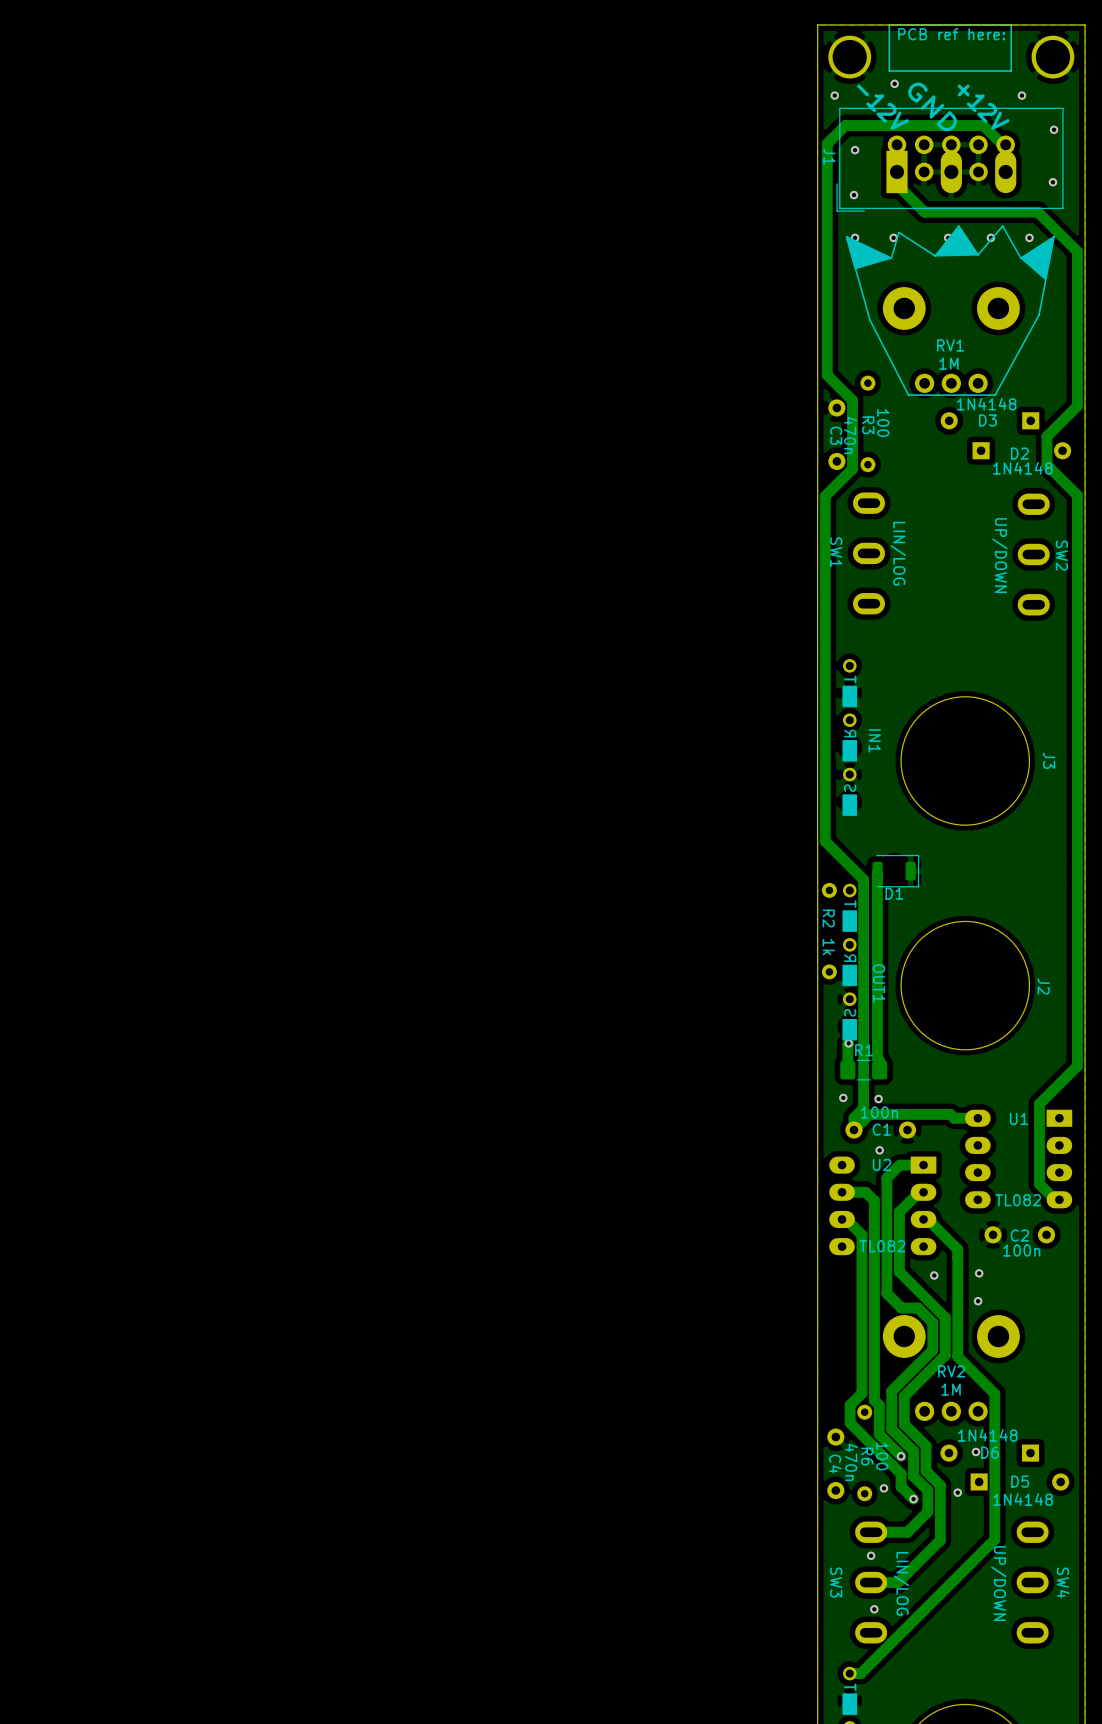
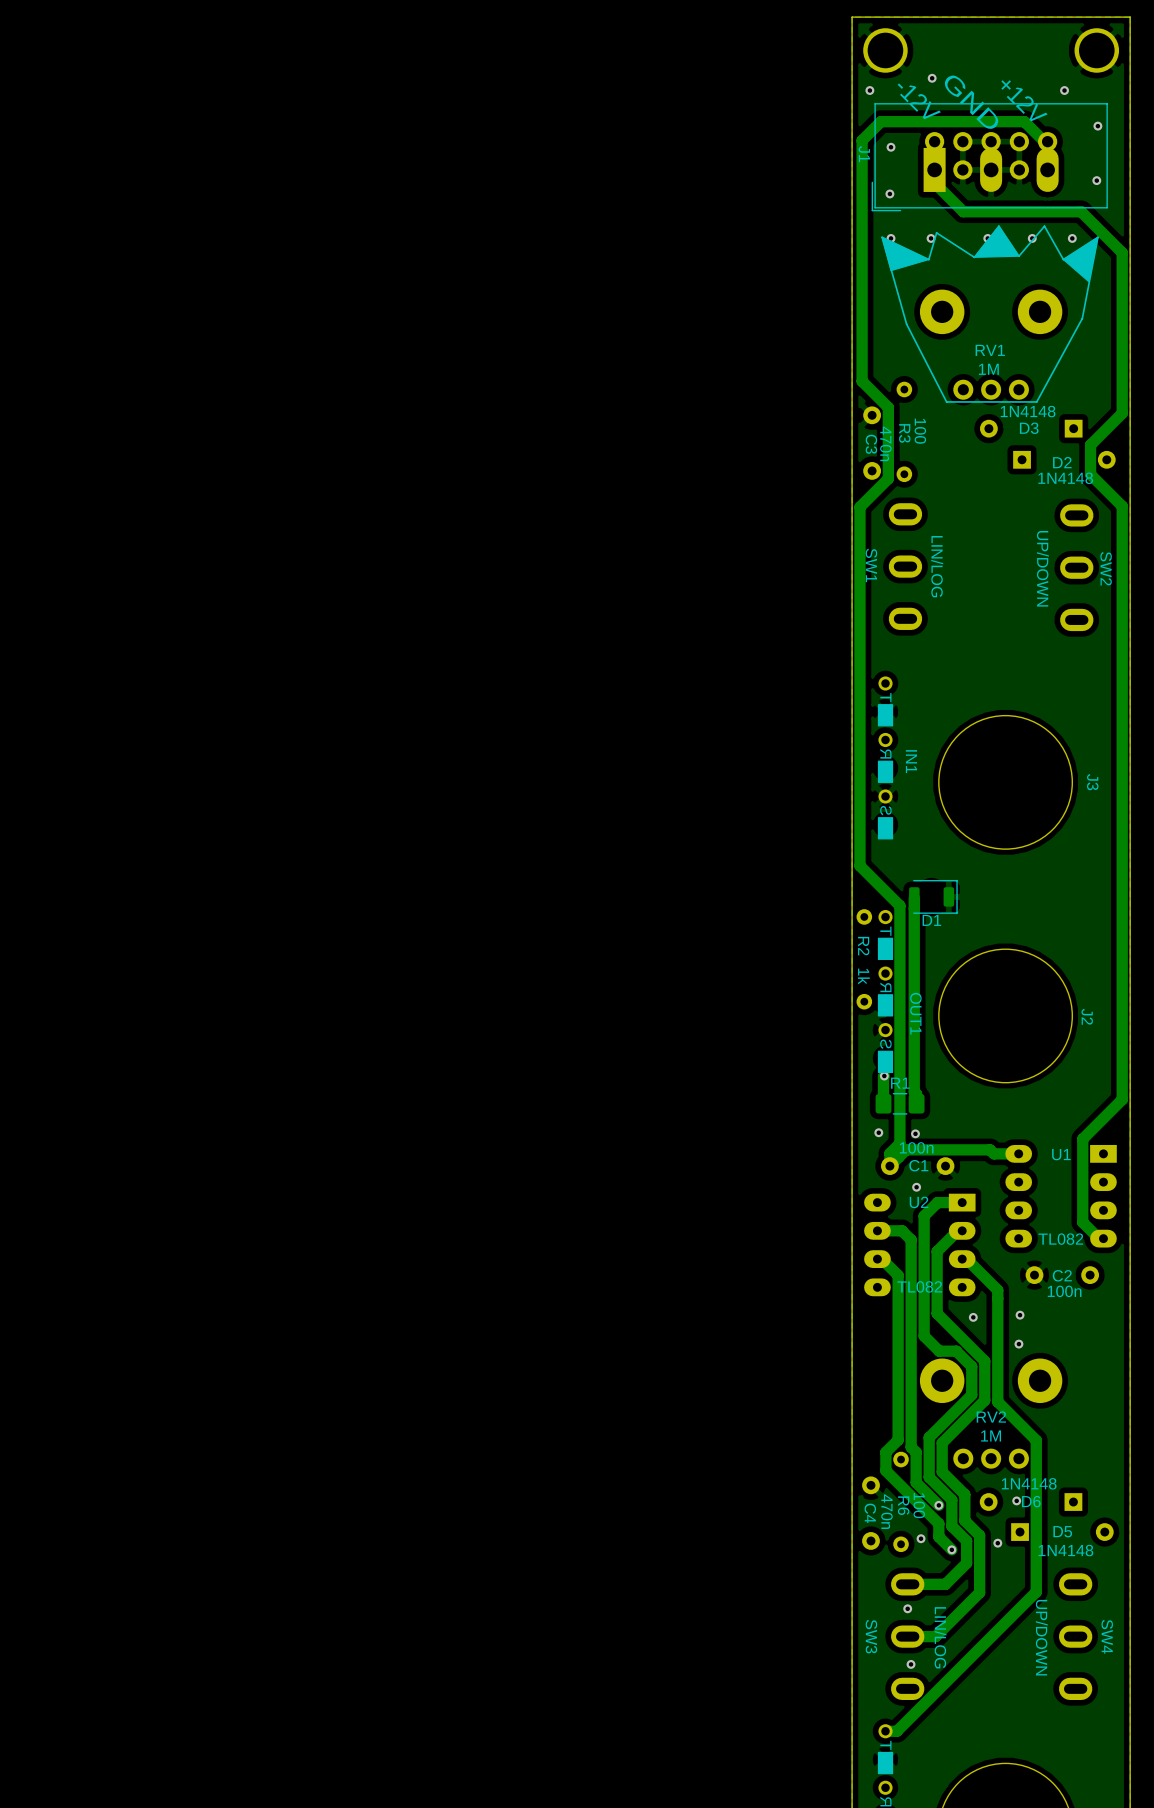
line: (1011, 24) (889, 24) (889, 70) (1011, 70) (1011, 24) -> none
text: PCB ref here: (951, 34) -> none

